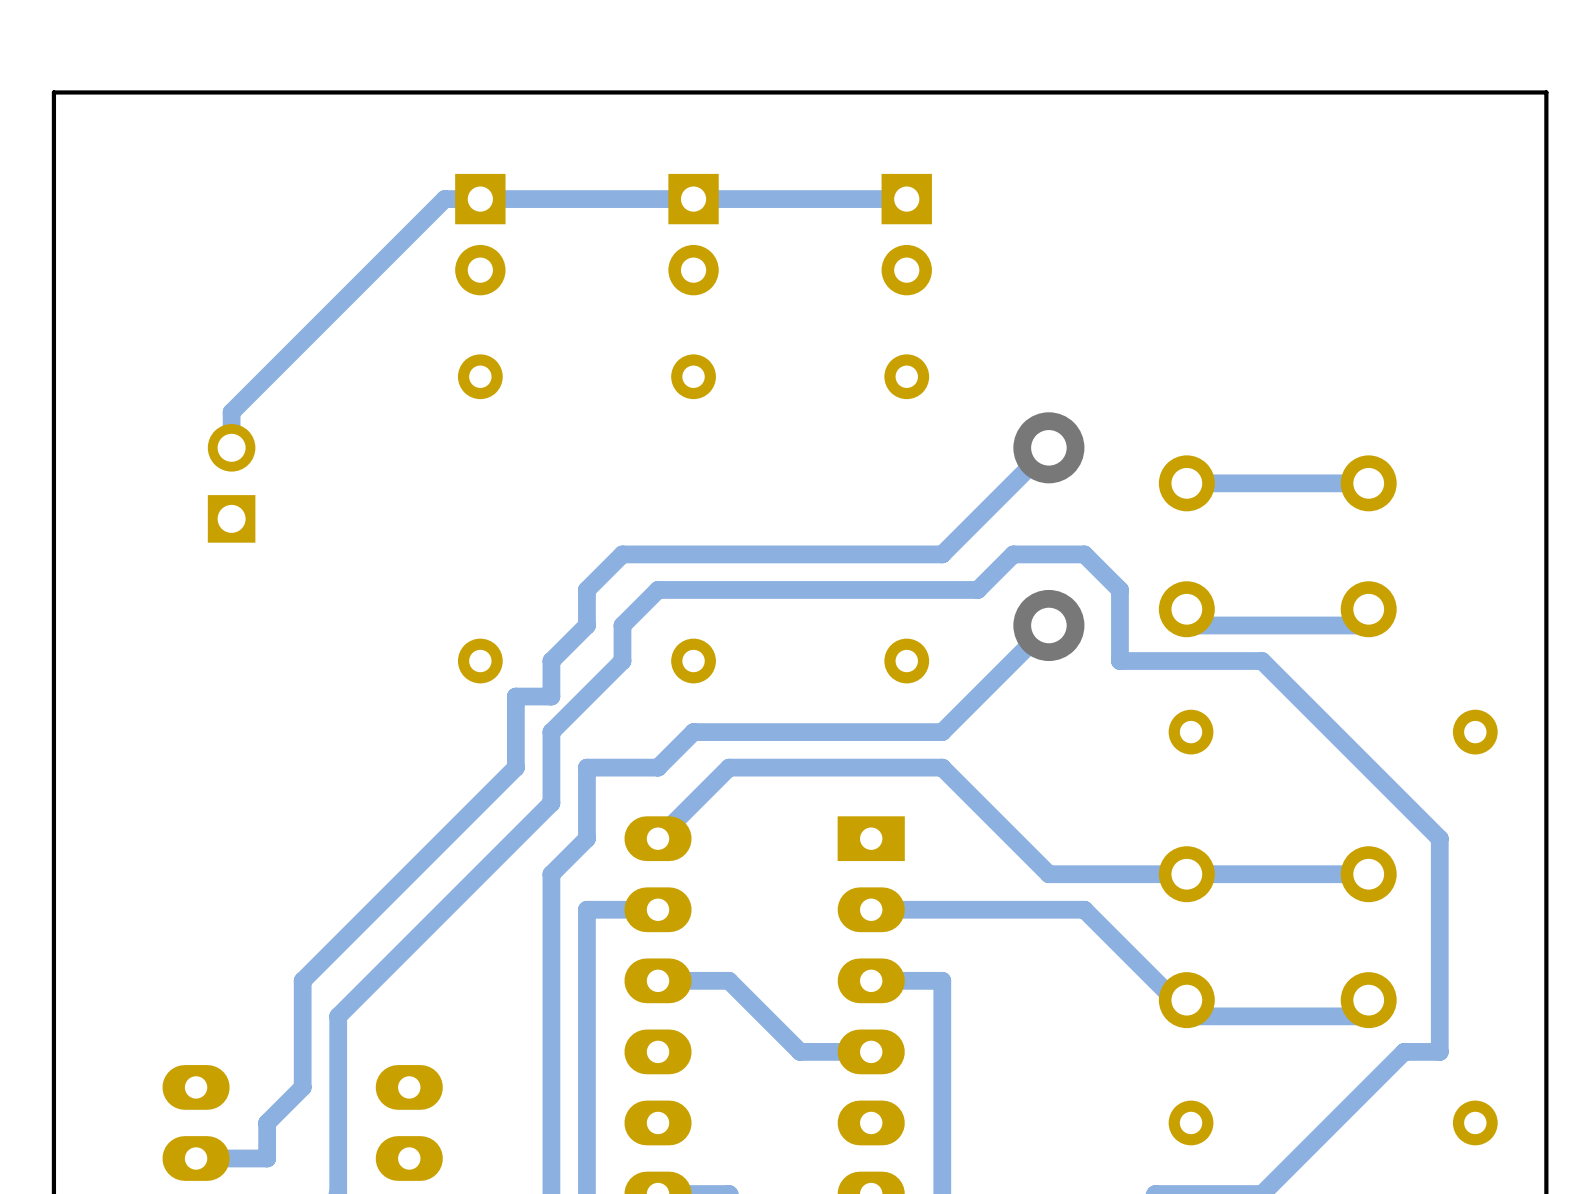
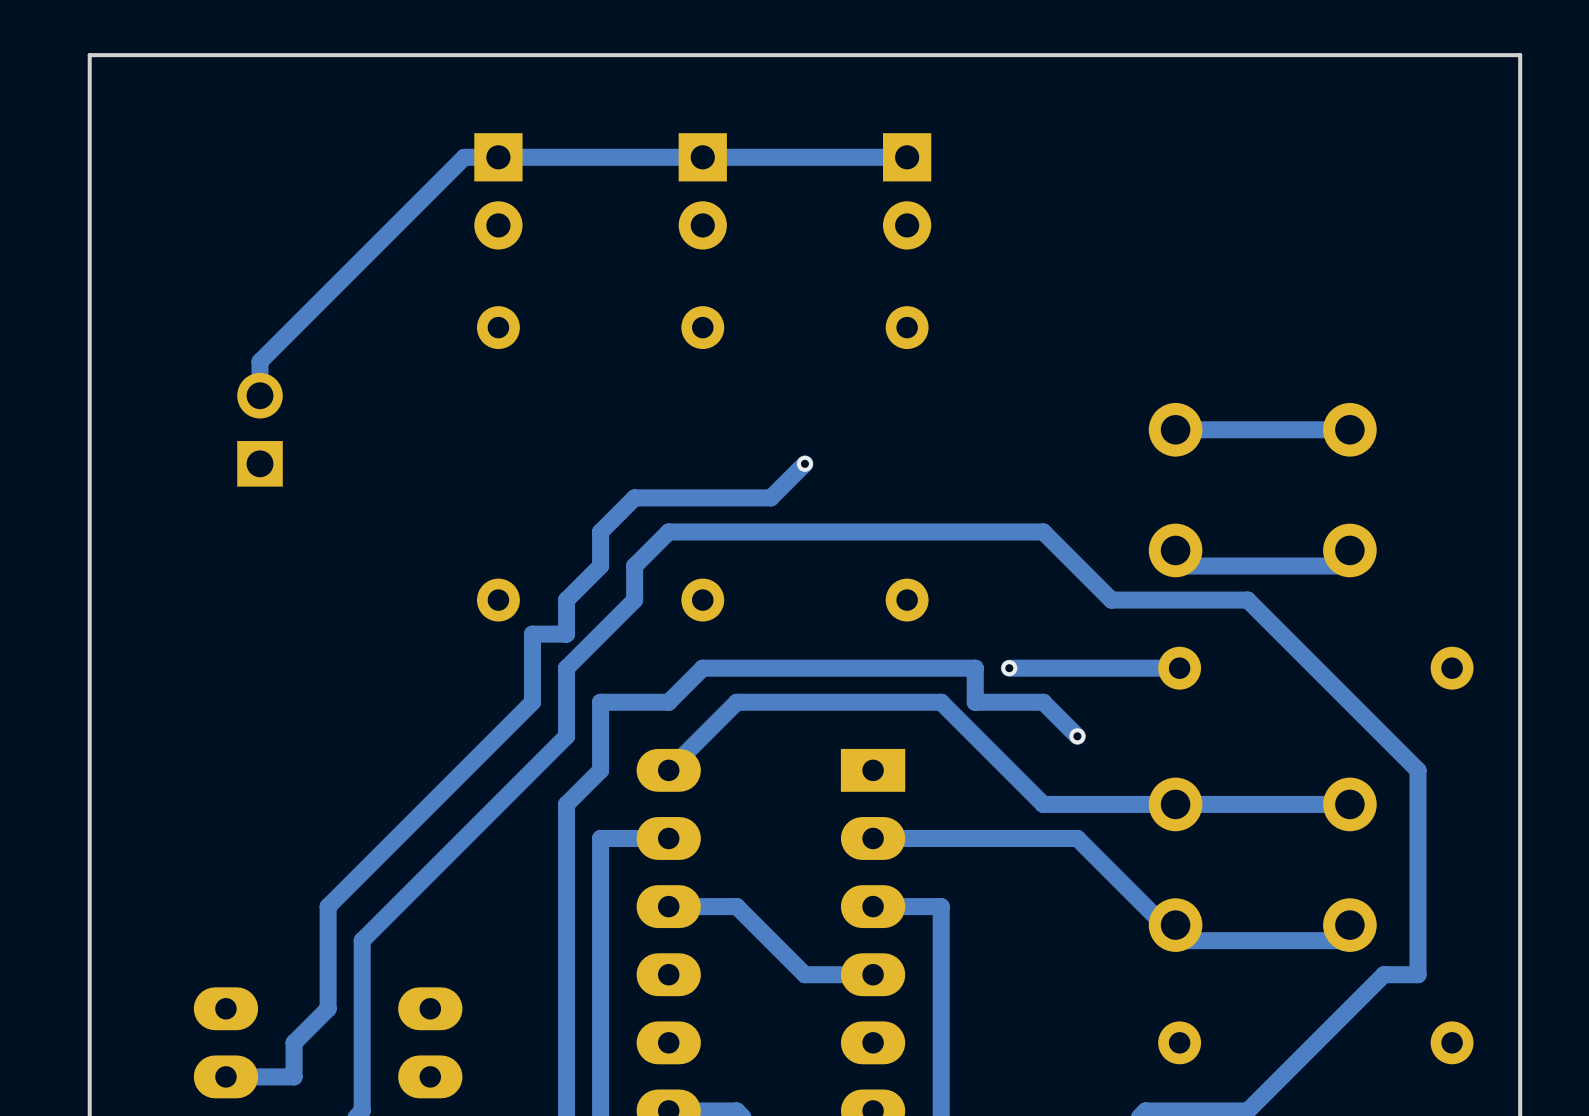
track: (1048, 447) (942, 554) (764, 554) -> (804, 463) (770, 497)
via: (1048, 447) -> none
via: none -> (804, 463)
track: (977, 589) (1013, 554) (1084, 554) (1119, 589) (1119, 661) -> (975, 531) (1043, 531) (1111, 600)
track: (1048, 625) (942, 732) -> (1077, 736) (1043, 702) (975, 702) (975, 668) (941, 668)
via: (1048, 625) -> none
via: none -> (1009, 668)
track: none -> (1179, 668) (1009, 668)
via: none -> (1077, 736)

